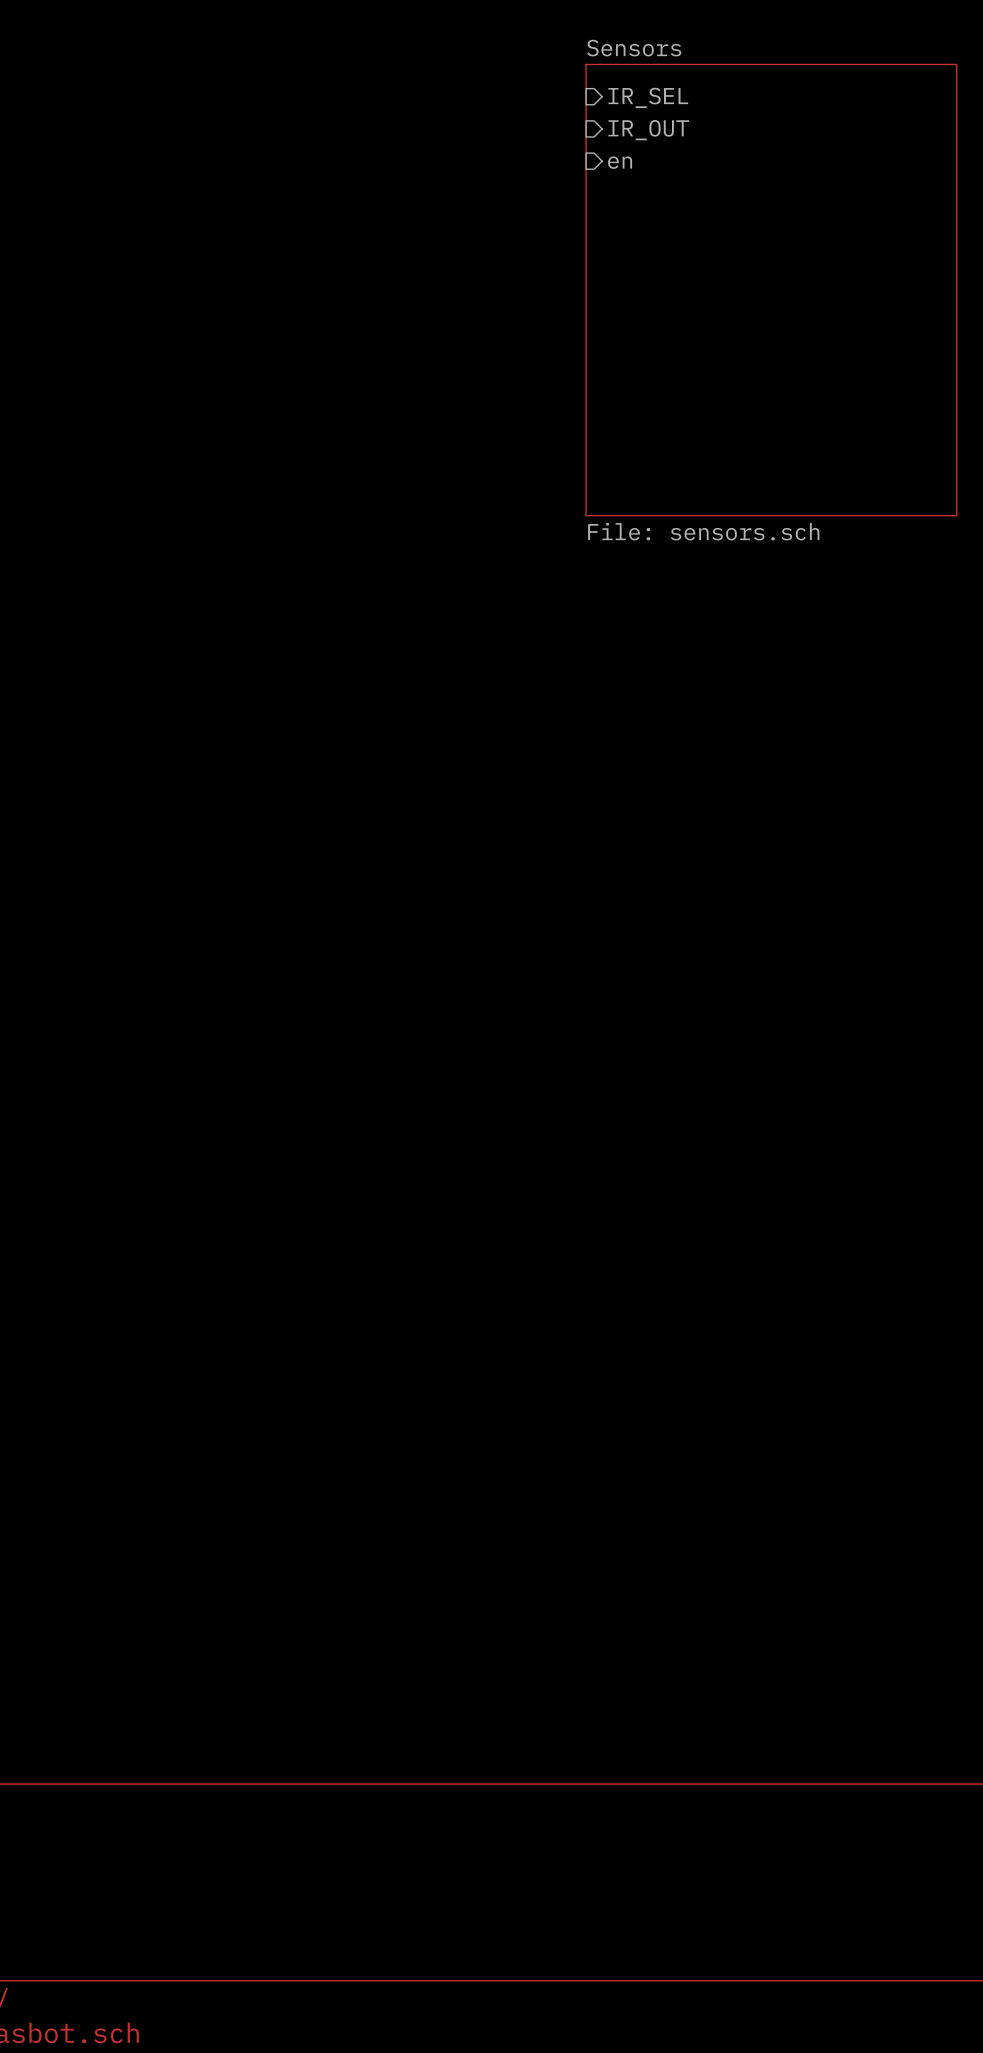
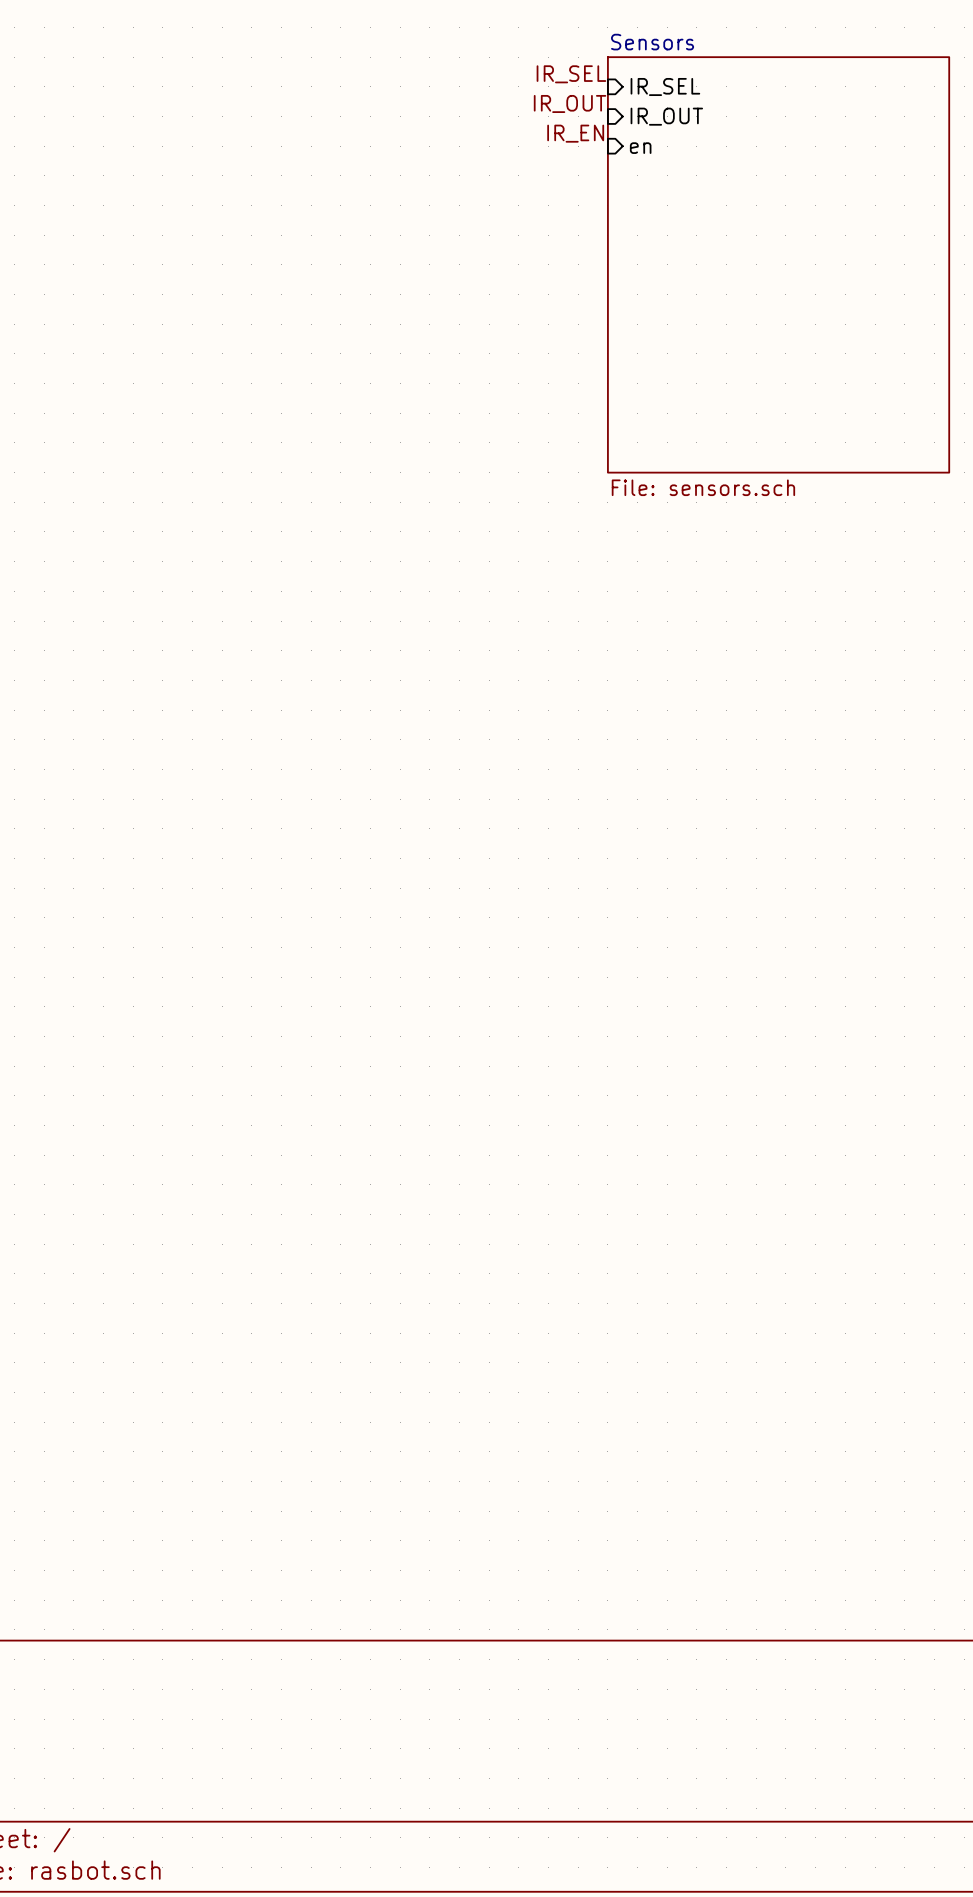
label: none -> IR_SEL (571, 74)
label: none -> IR_OUT (570, 103)
label: none -> IR_EN (575, 133)

